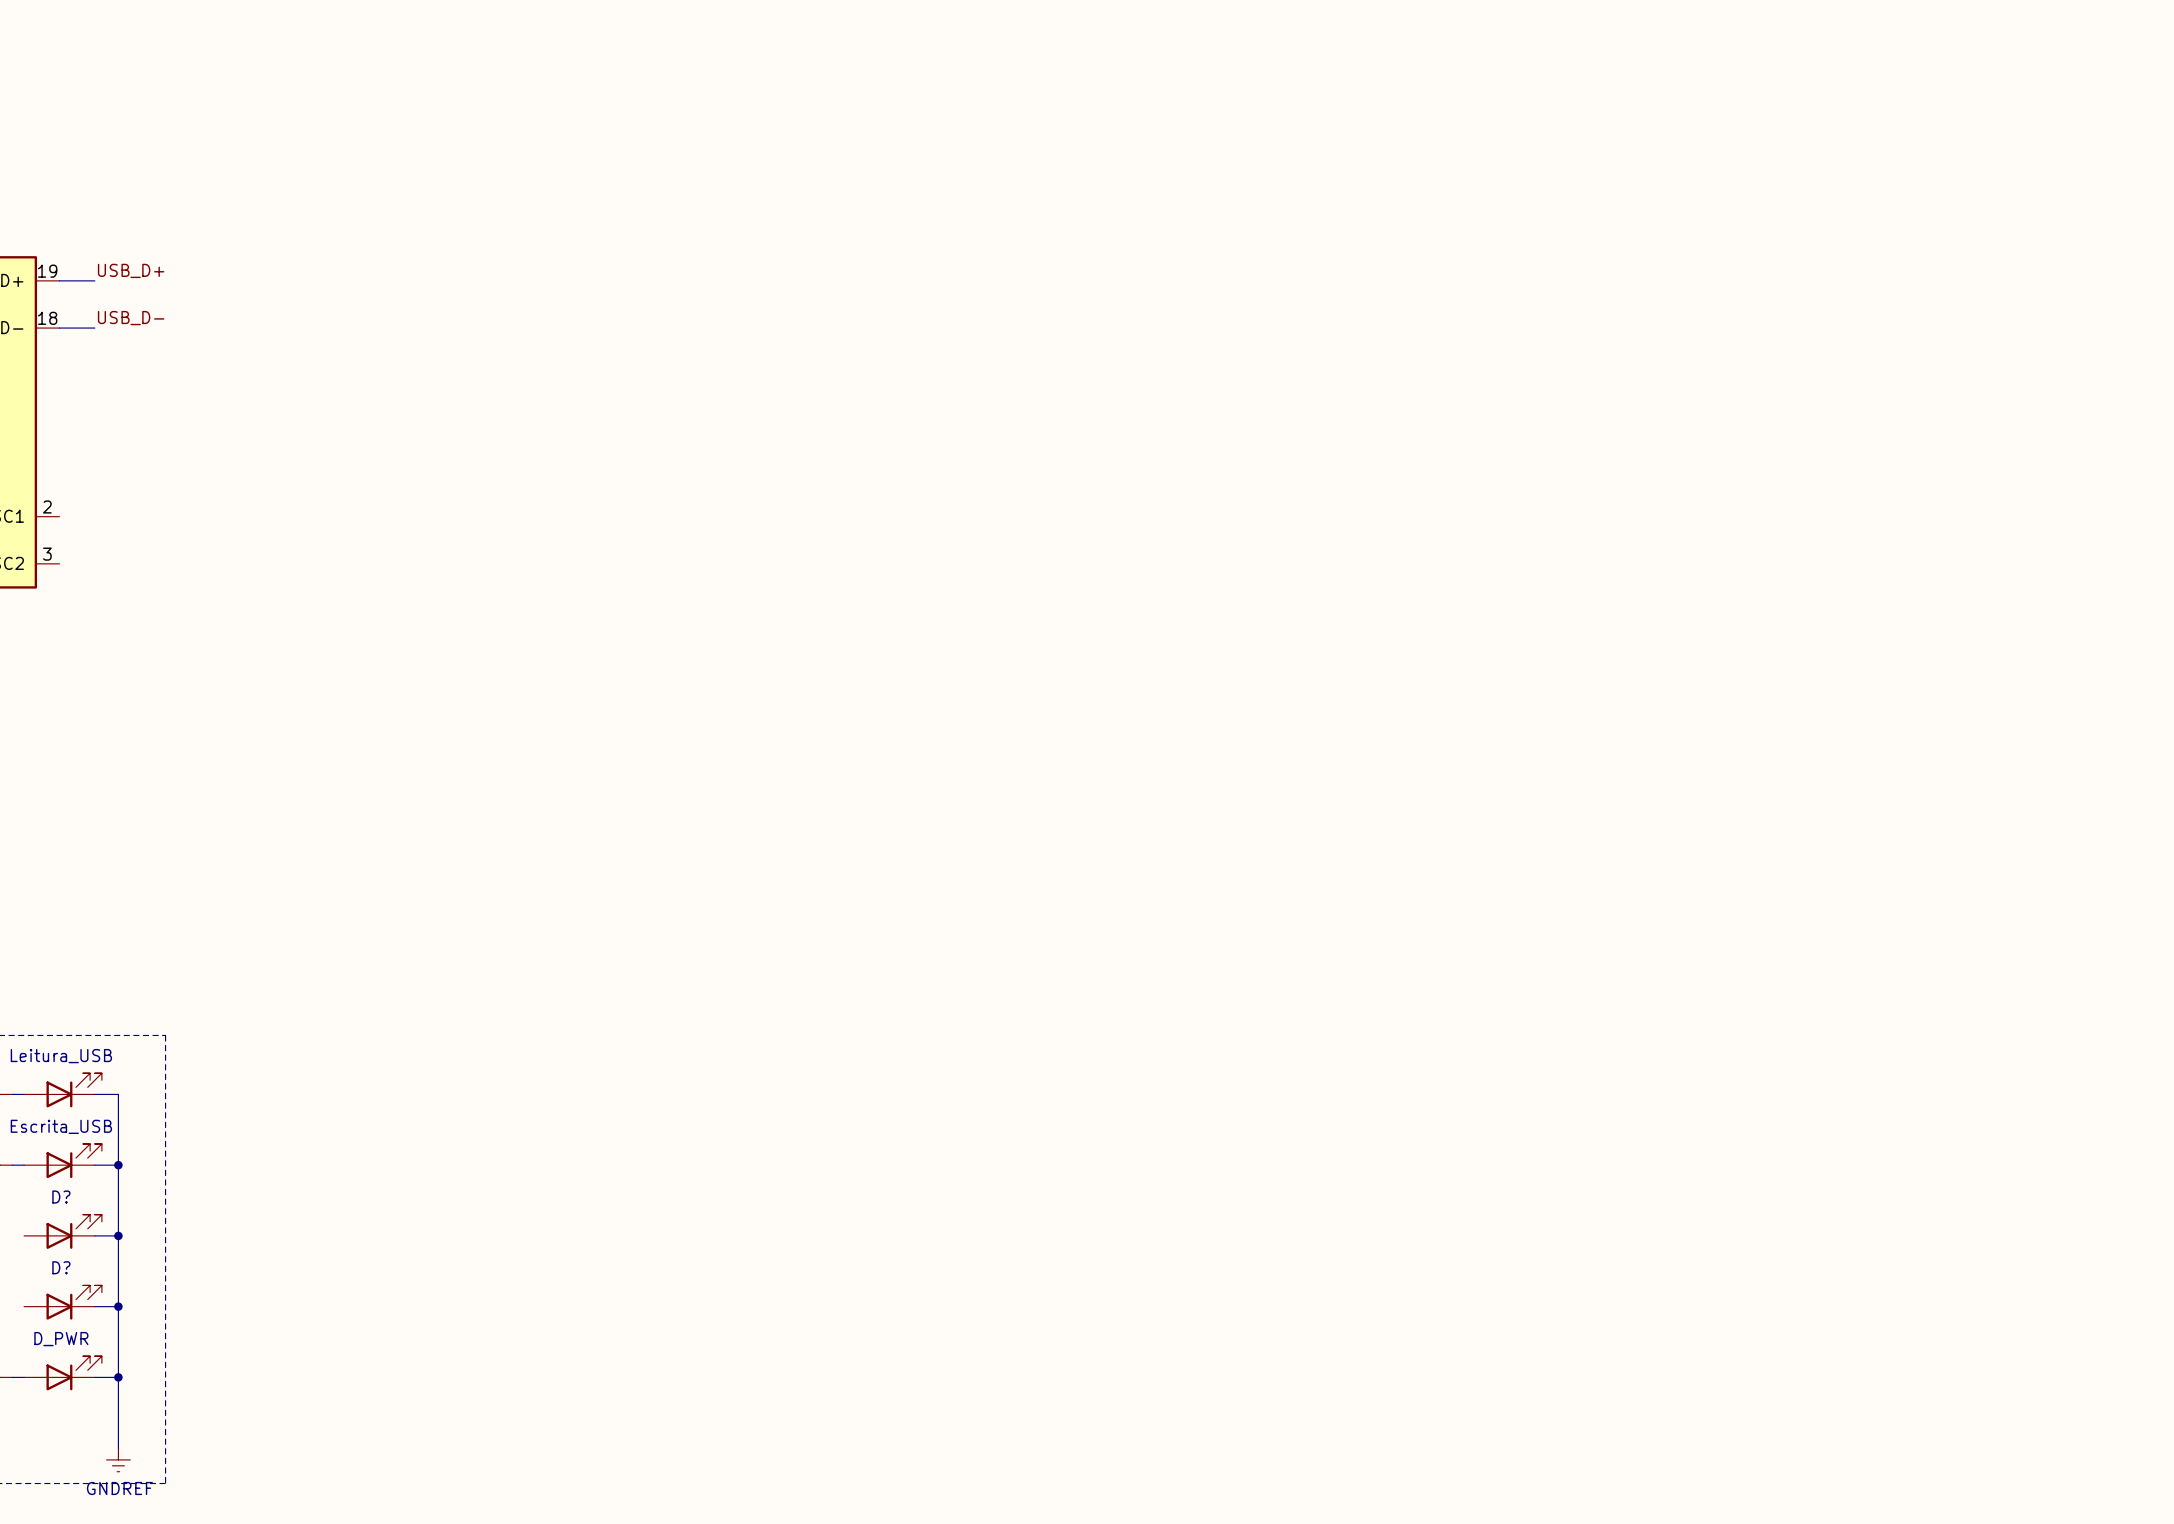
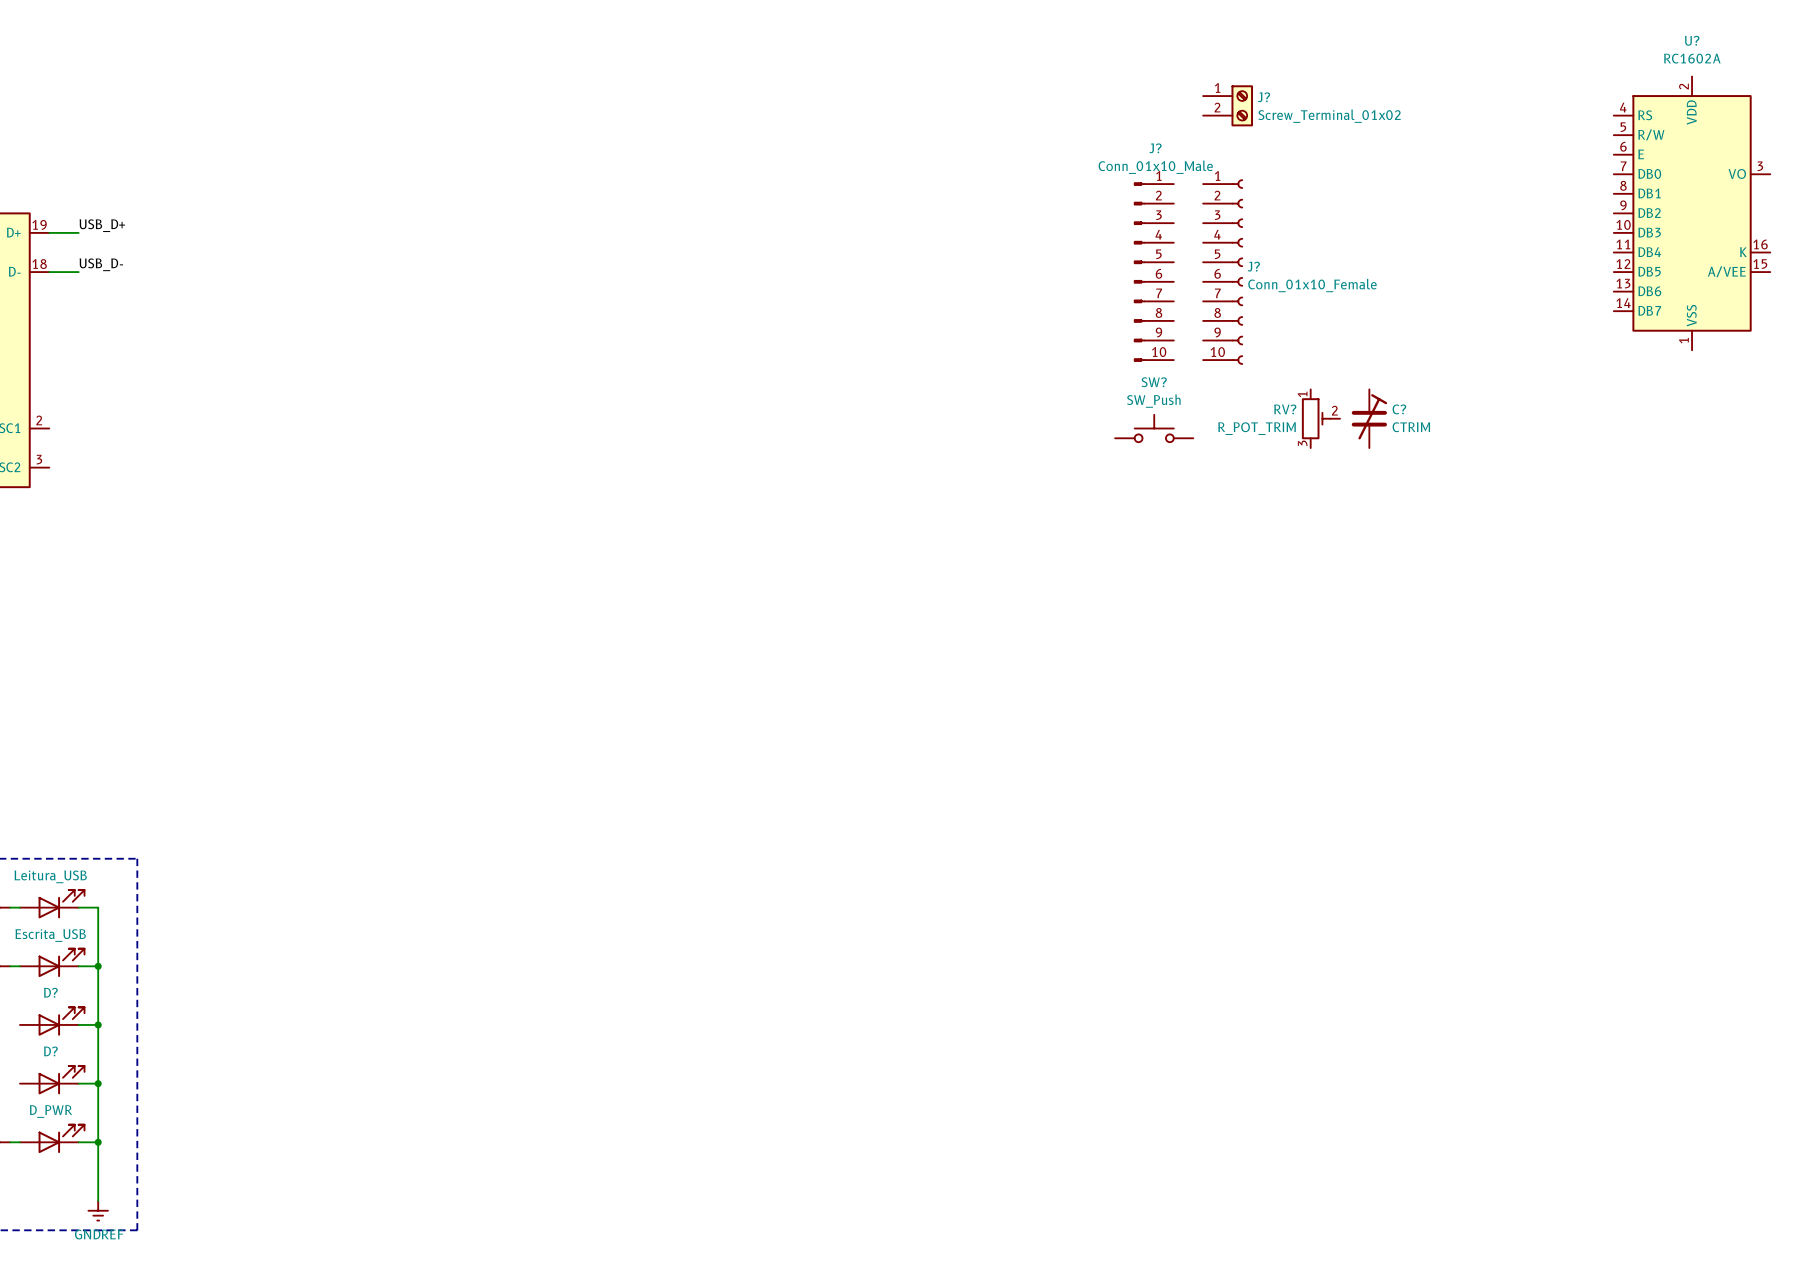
J?: none -> Screw_Terminal_01x02 (1228, 105)
U?: none -> RC1602A (1692, 213)
J?: none -> Conn_01x10_Male (1153, 272)
J?: none -> Conn_01x10_Female (1222, 272)
RV?: none -> R_POT_TRIM (1320, 418)
C?: none -> CTRIM (1369, 418)
SW?: none -> SW_Push (1154, 428)

